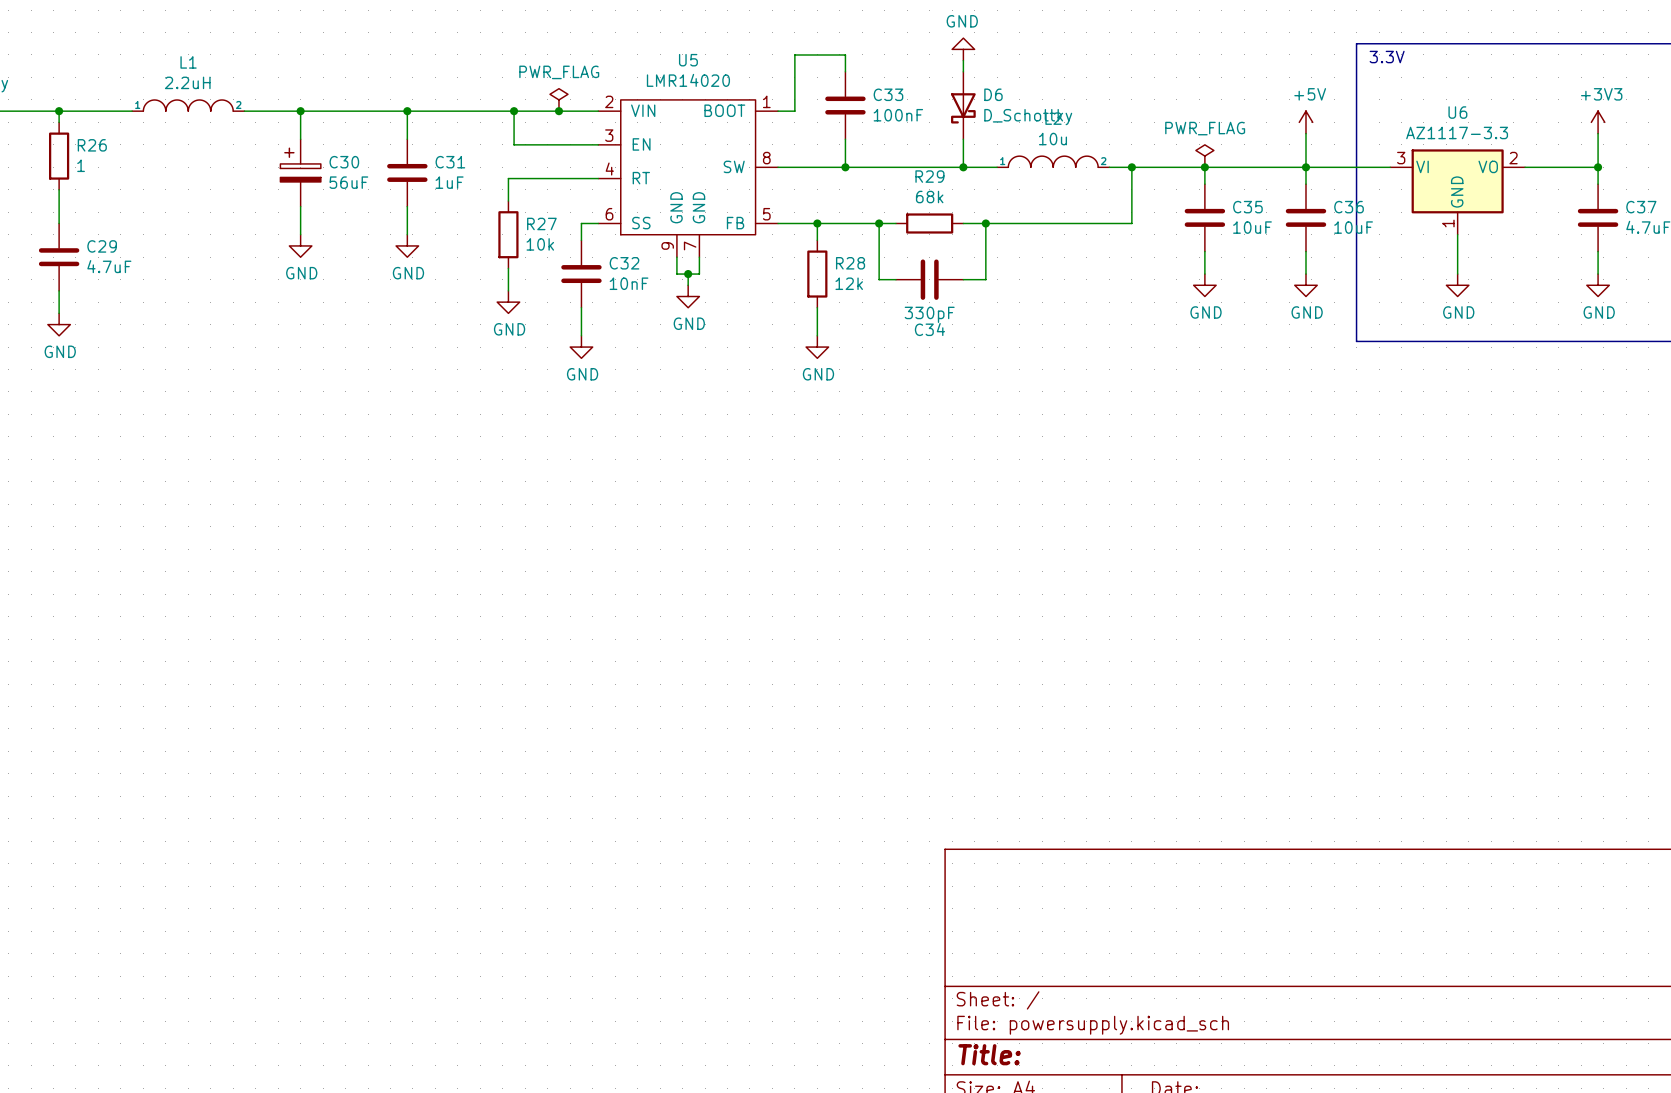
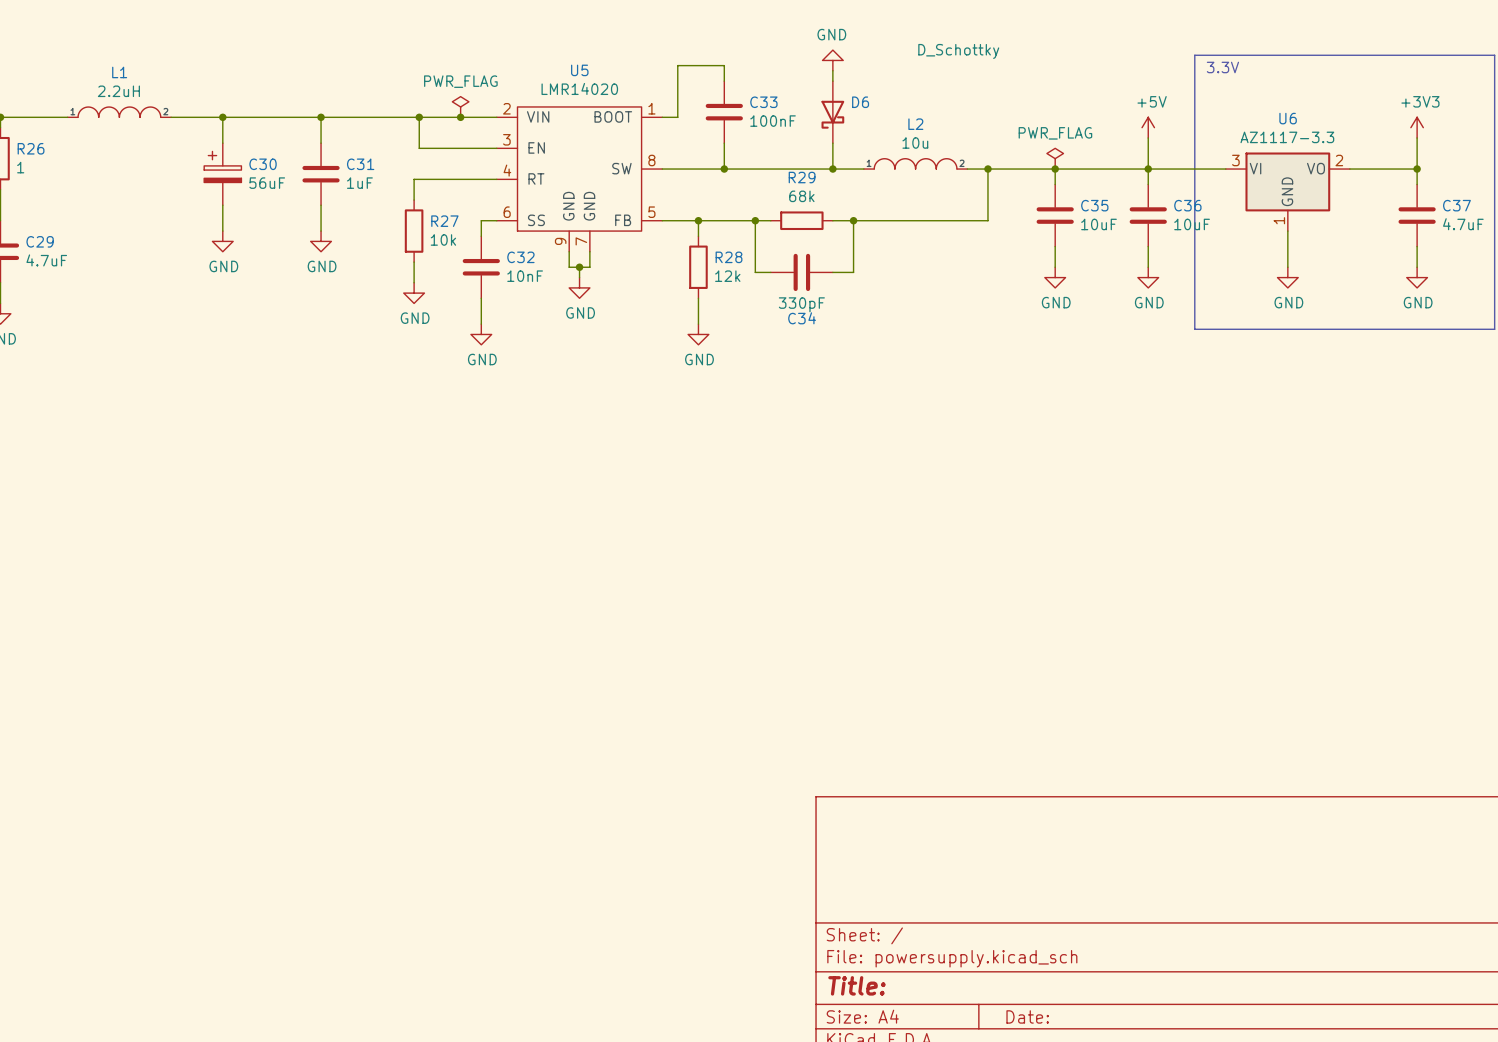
D6 value position: D_Schottky (1028, 117) -> D_Schottky (958, 51)

